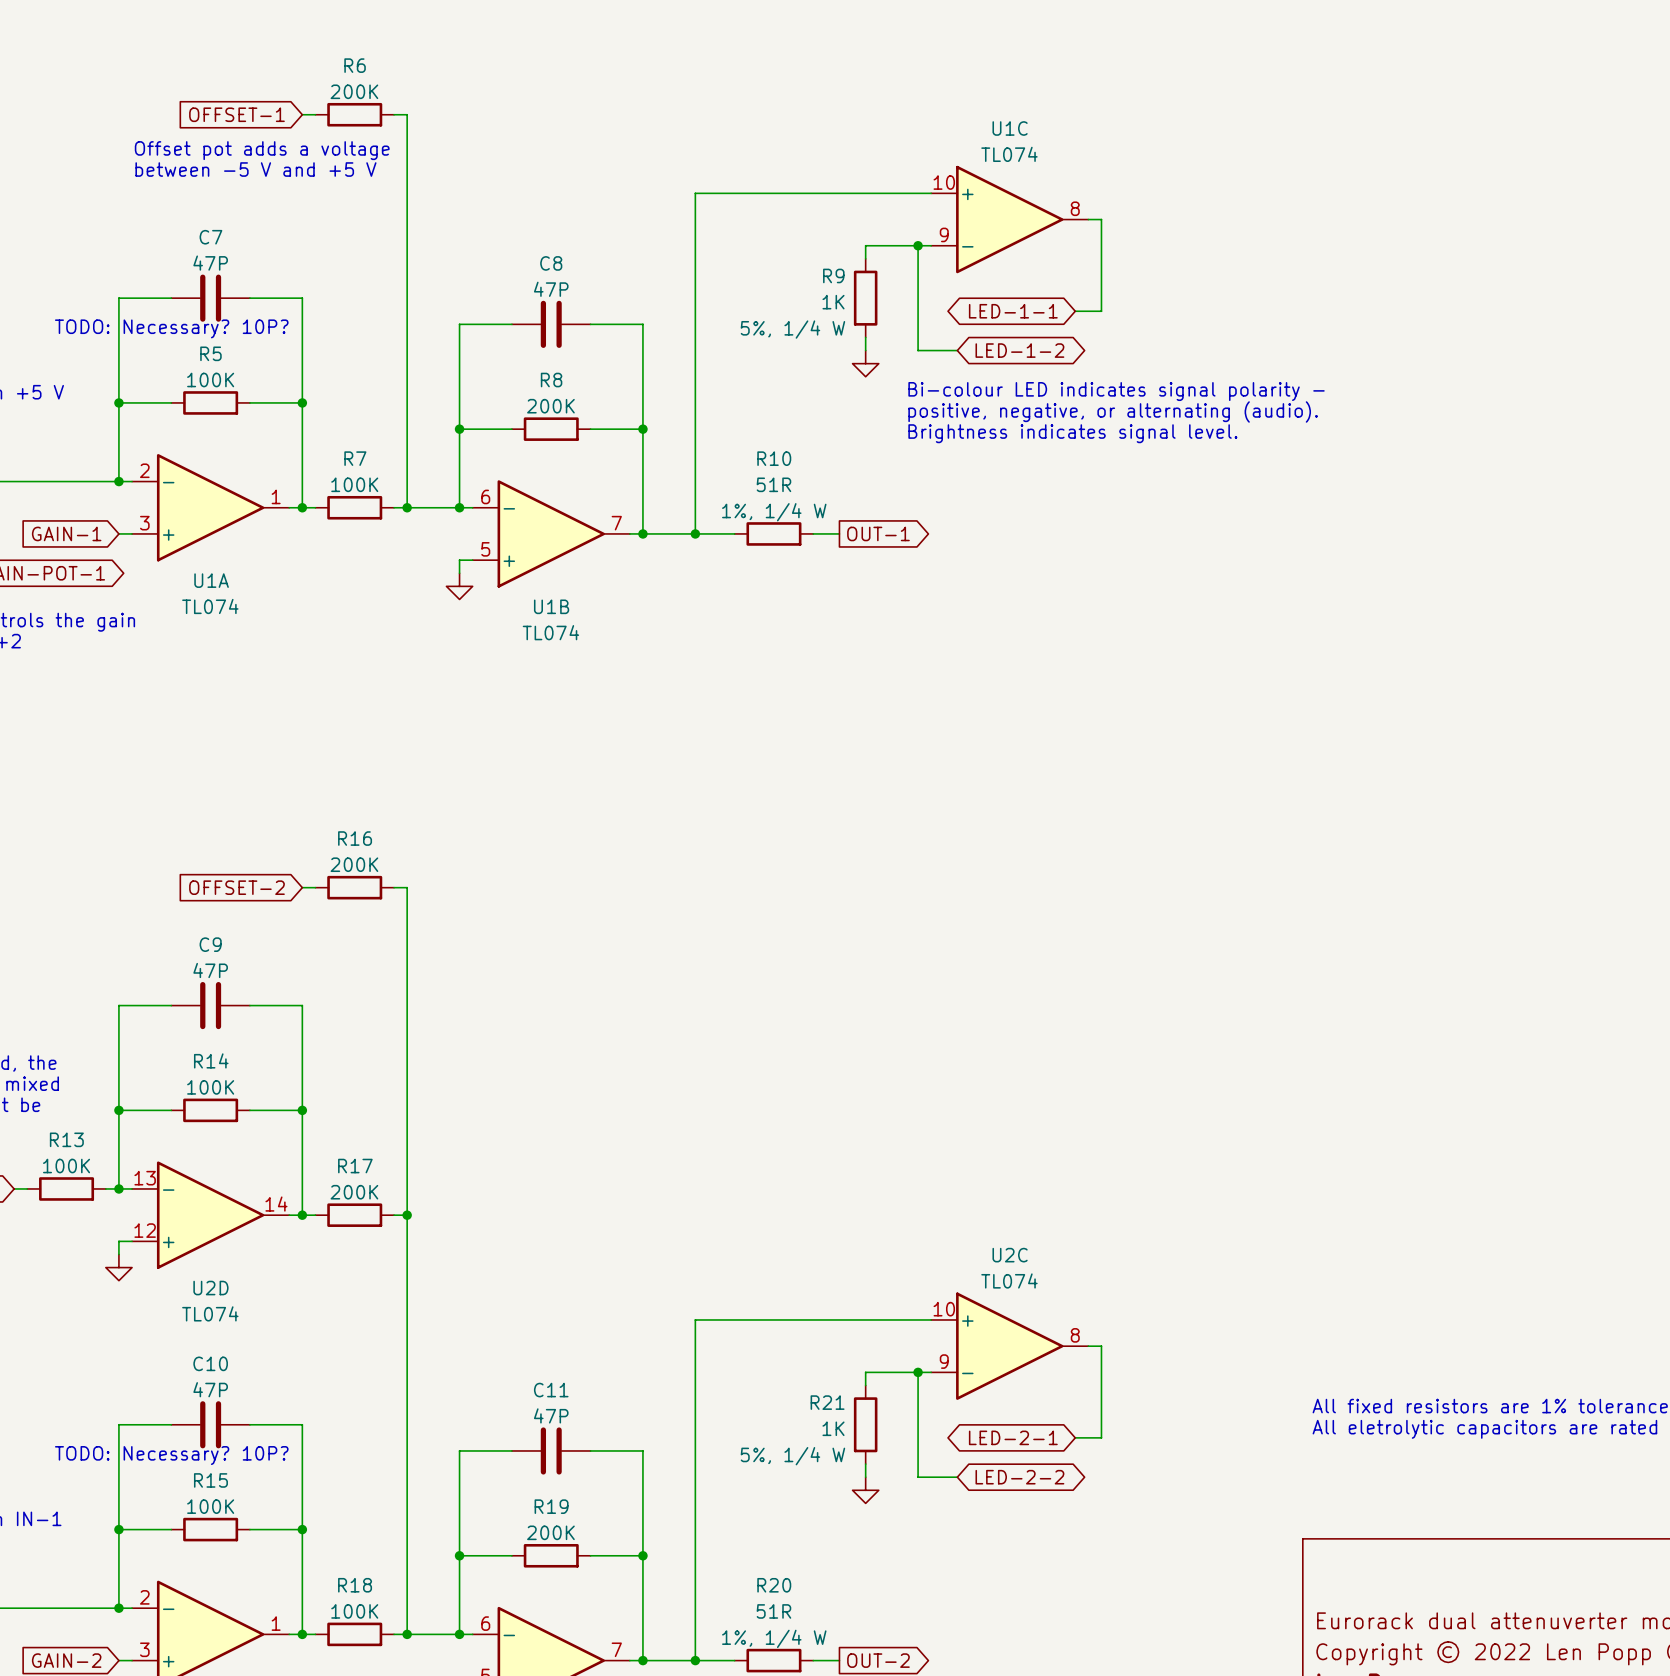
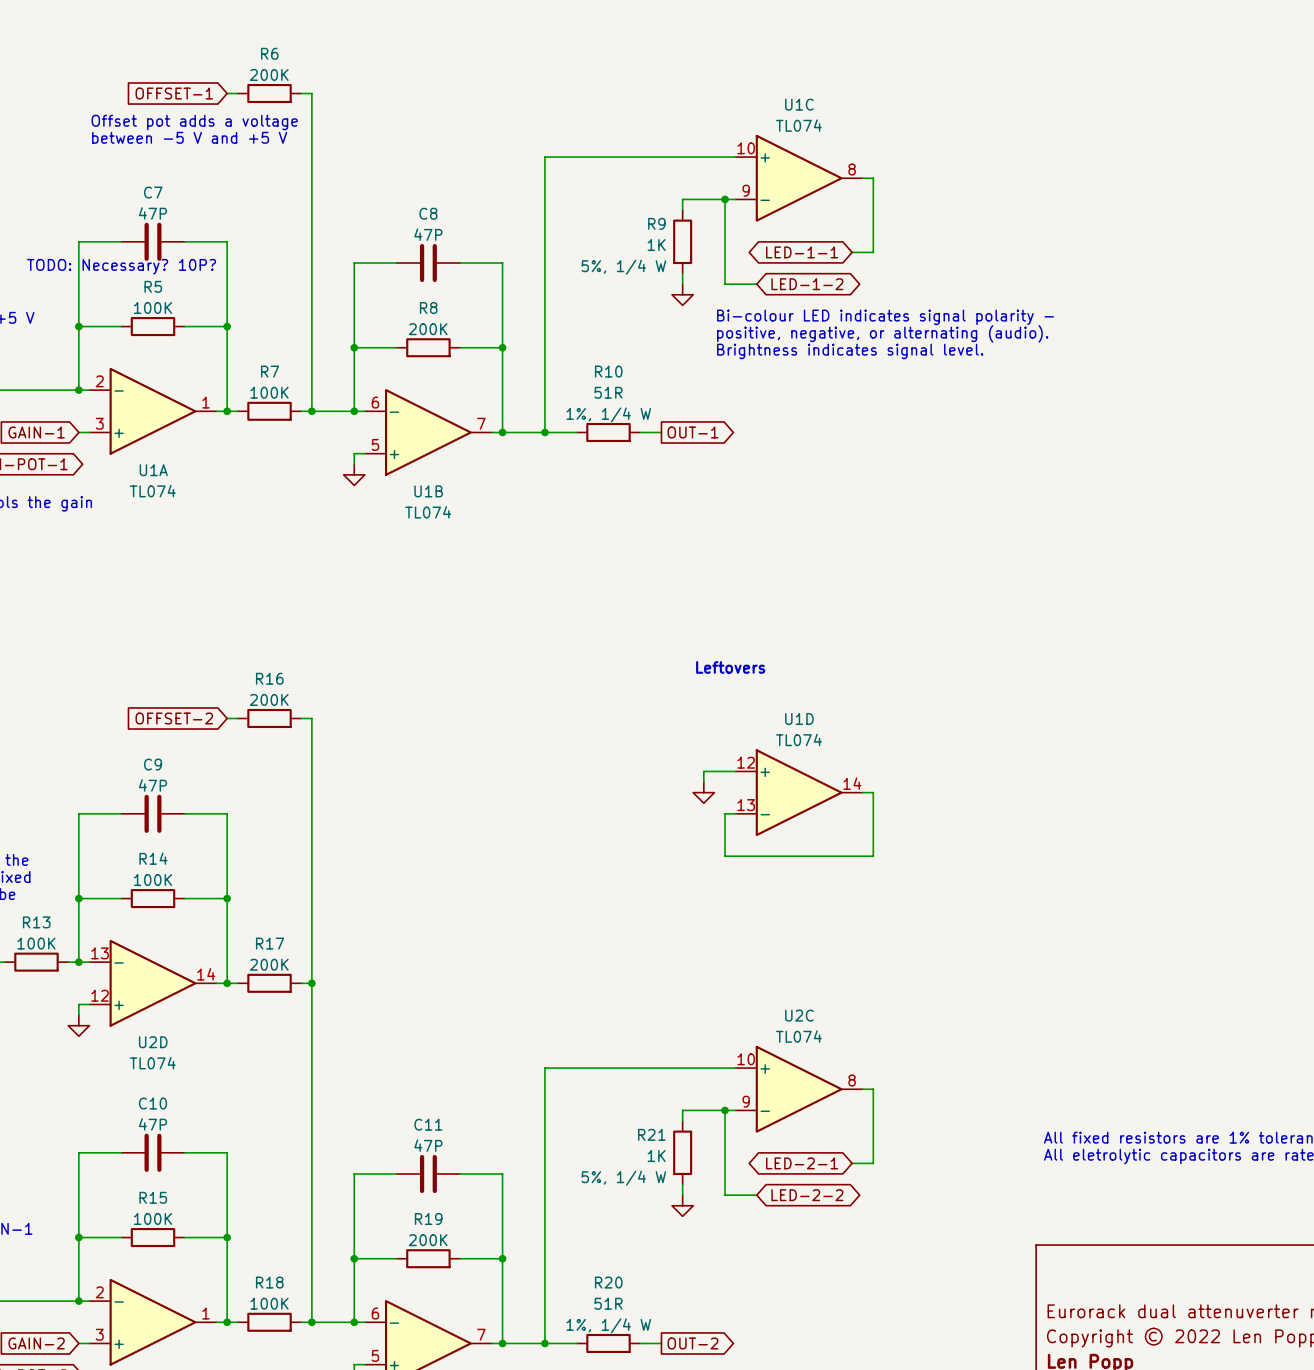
text: none -> Leftovers (730, 667)
wire: none -> (735, 771) (703, 771) (703, 782)
power symbol: none -> (703, 792)
U1D: none -> TL074 (799, 792)
wire: none -> (862, 792) (873, 792) (873, 856) (725, 856) (725, 813) (735, 813)
text: TODO: Necessary? 10P? (171, 1455) -> none

